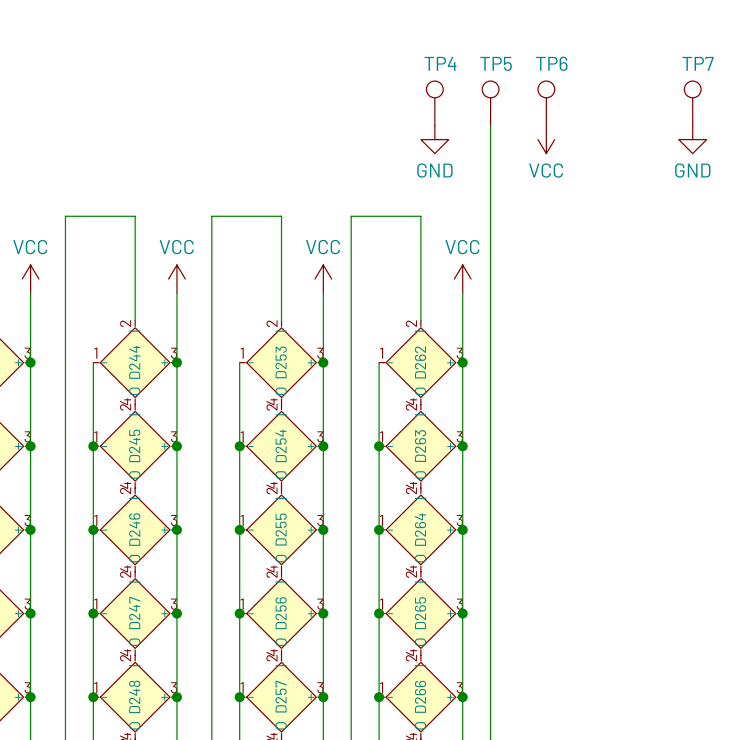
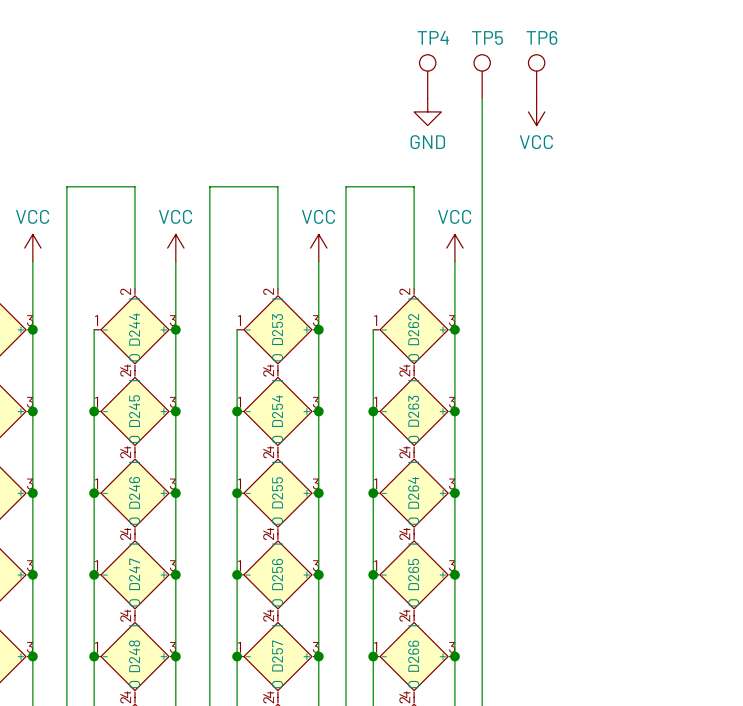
TP7: (692, 103) -> none
power symbol: GND (692, 139) -> none

